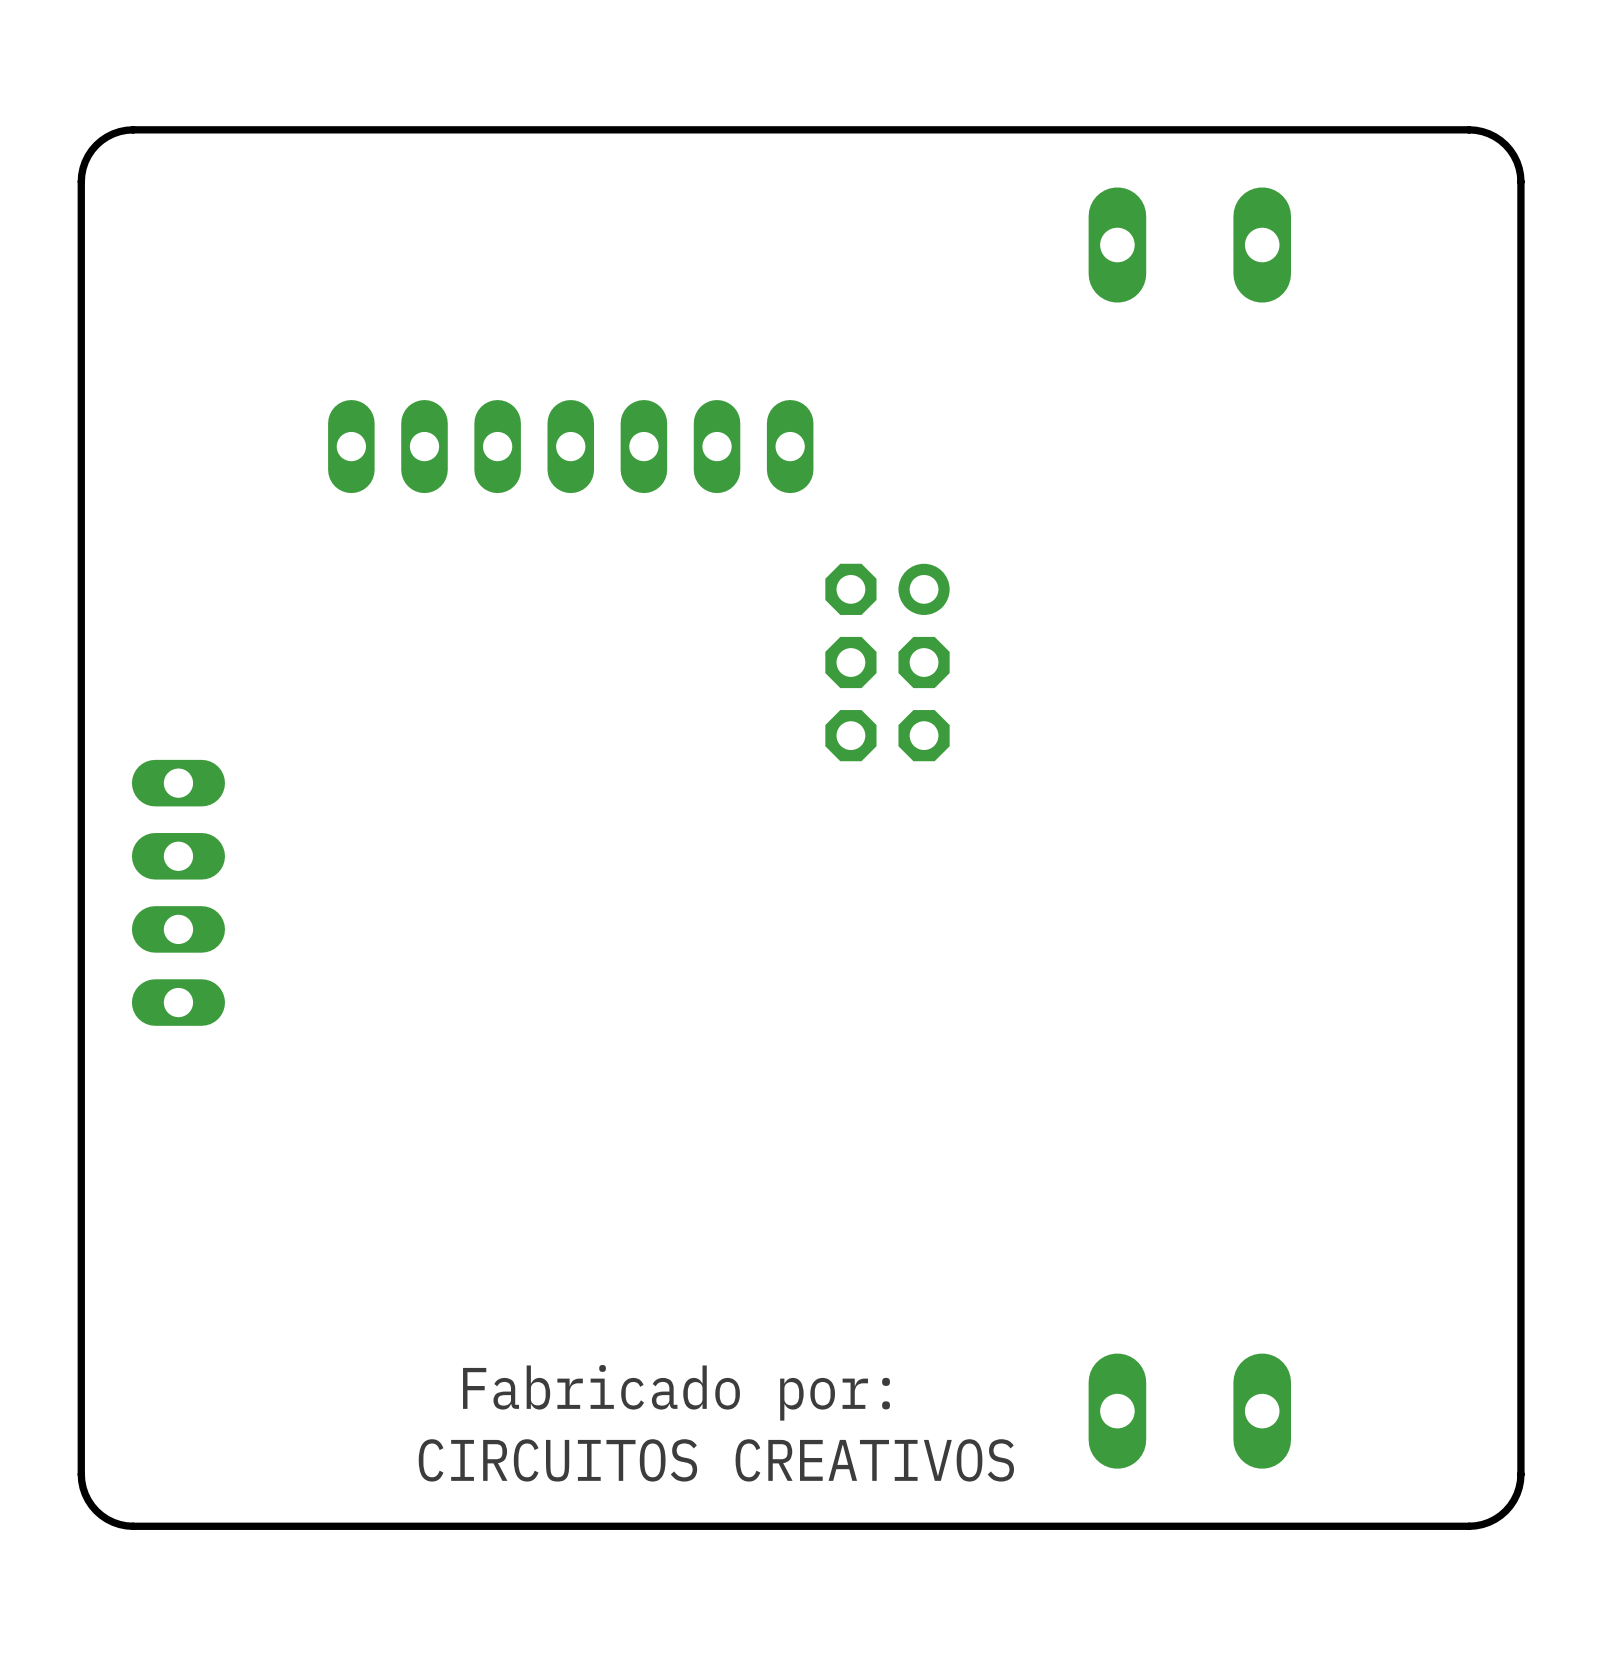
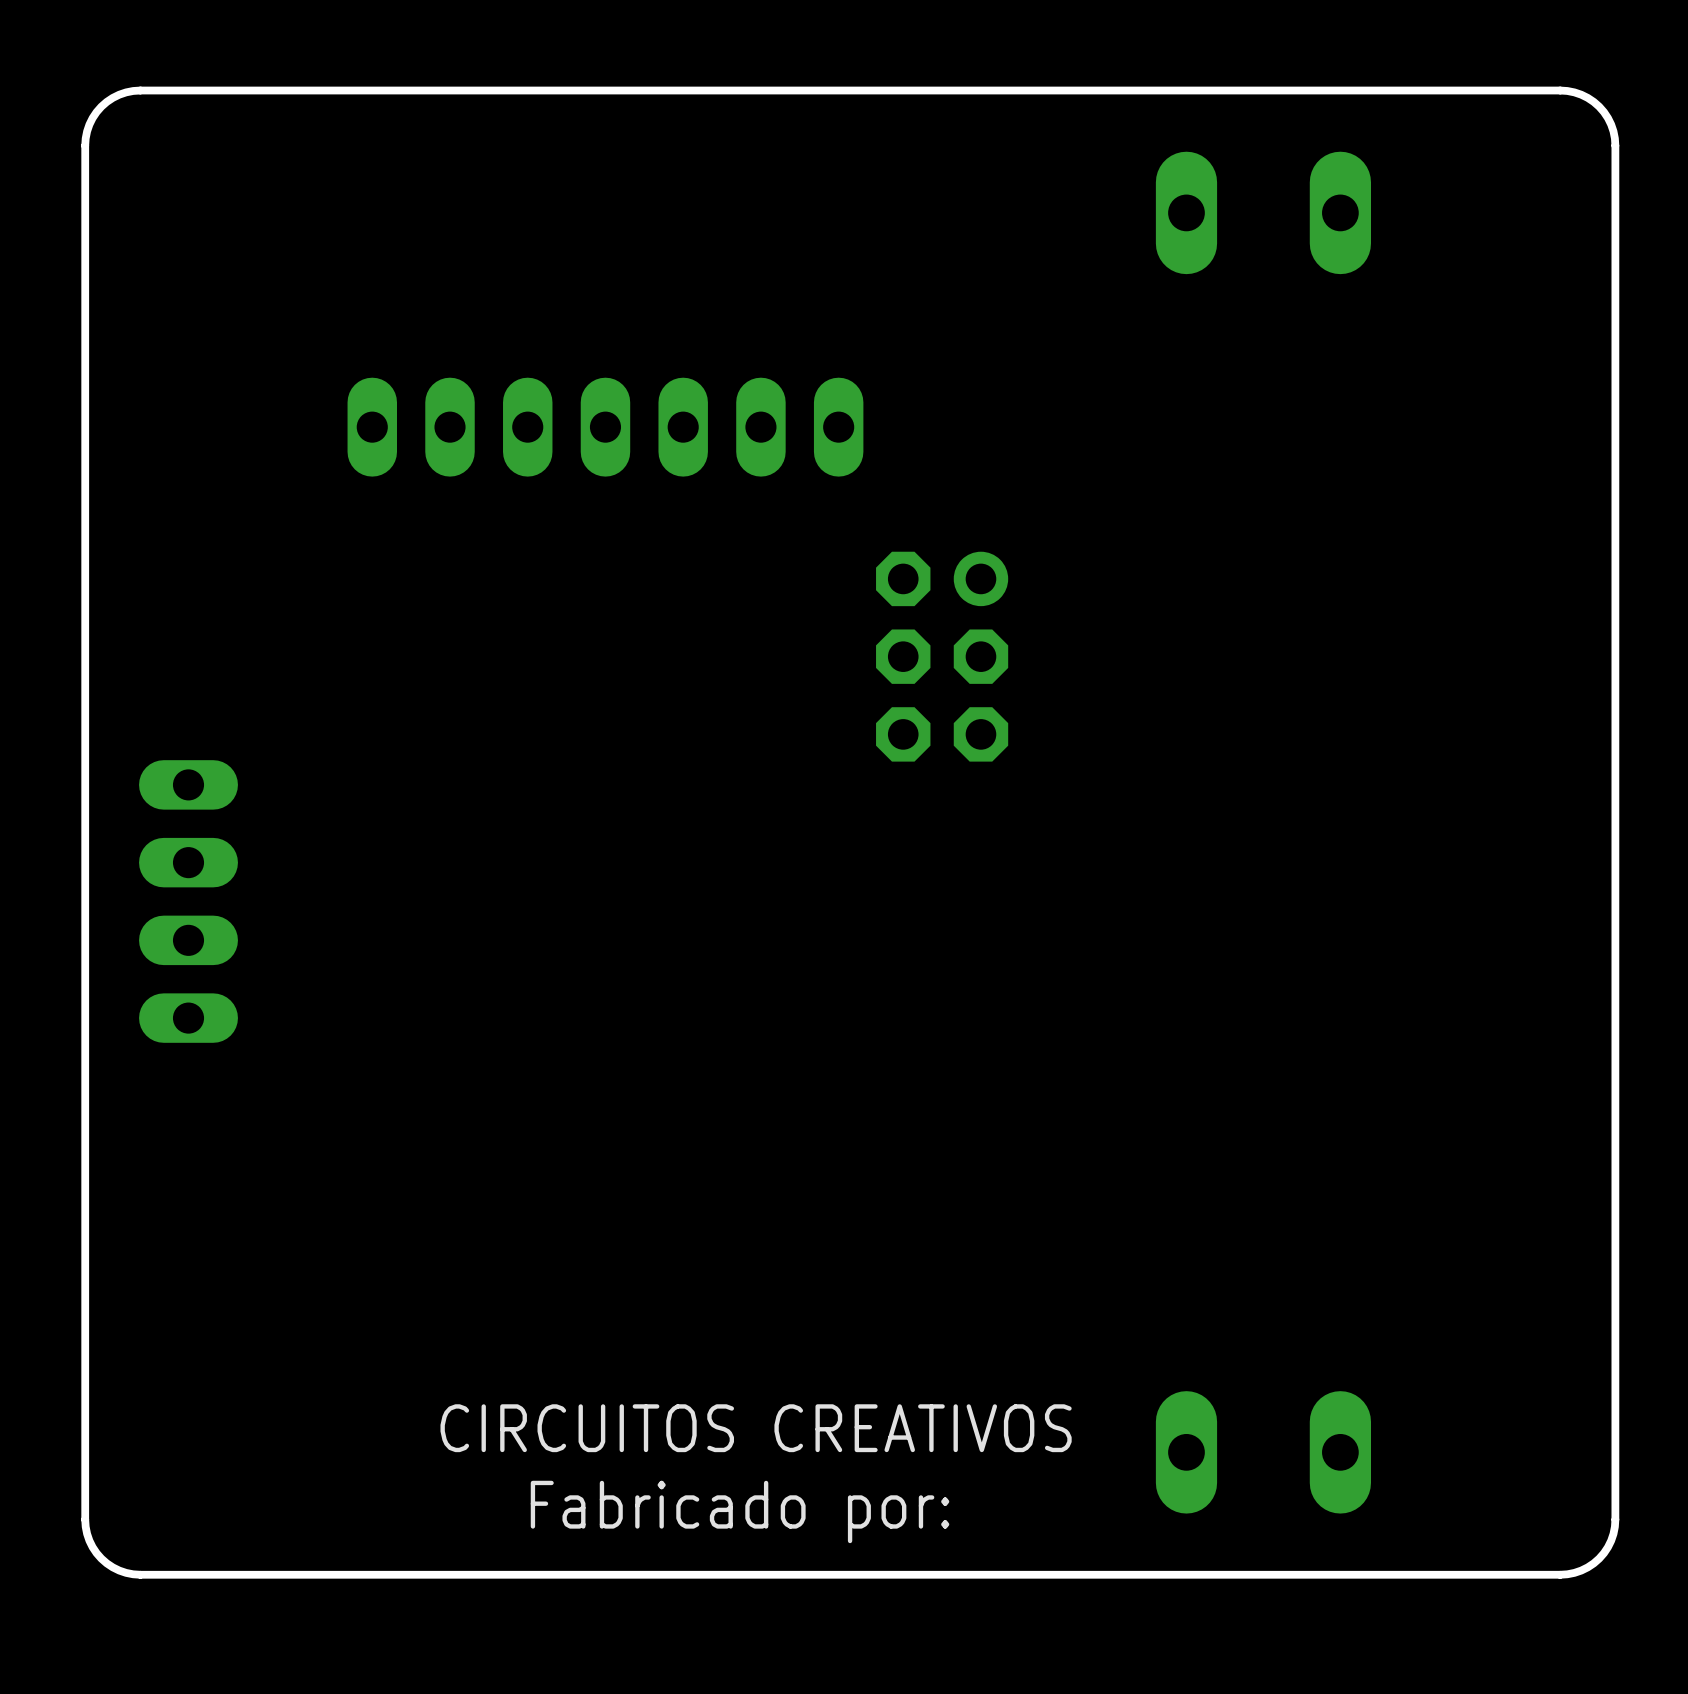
text position: Fabricado por: (676, 1392) -> Fabricado por: (740, 1511)
text position: CIRCUITOS CREATIVOS (716, 1460) -> CIRCUITOS CREATIVOS (756, 1428)

